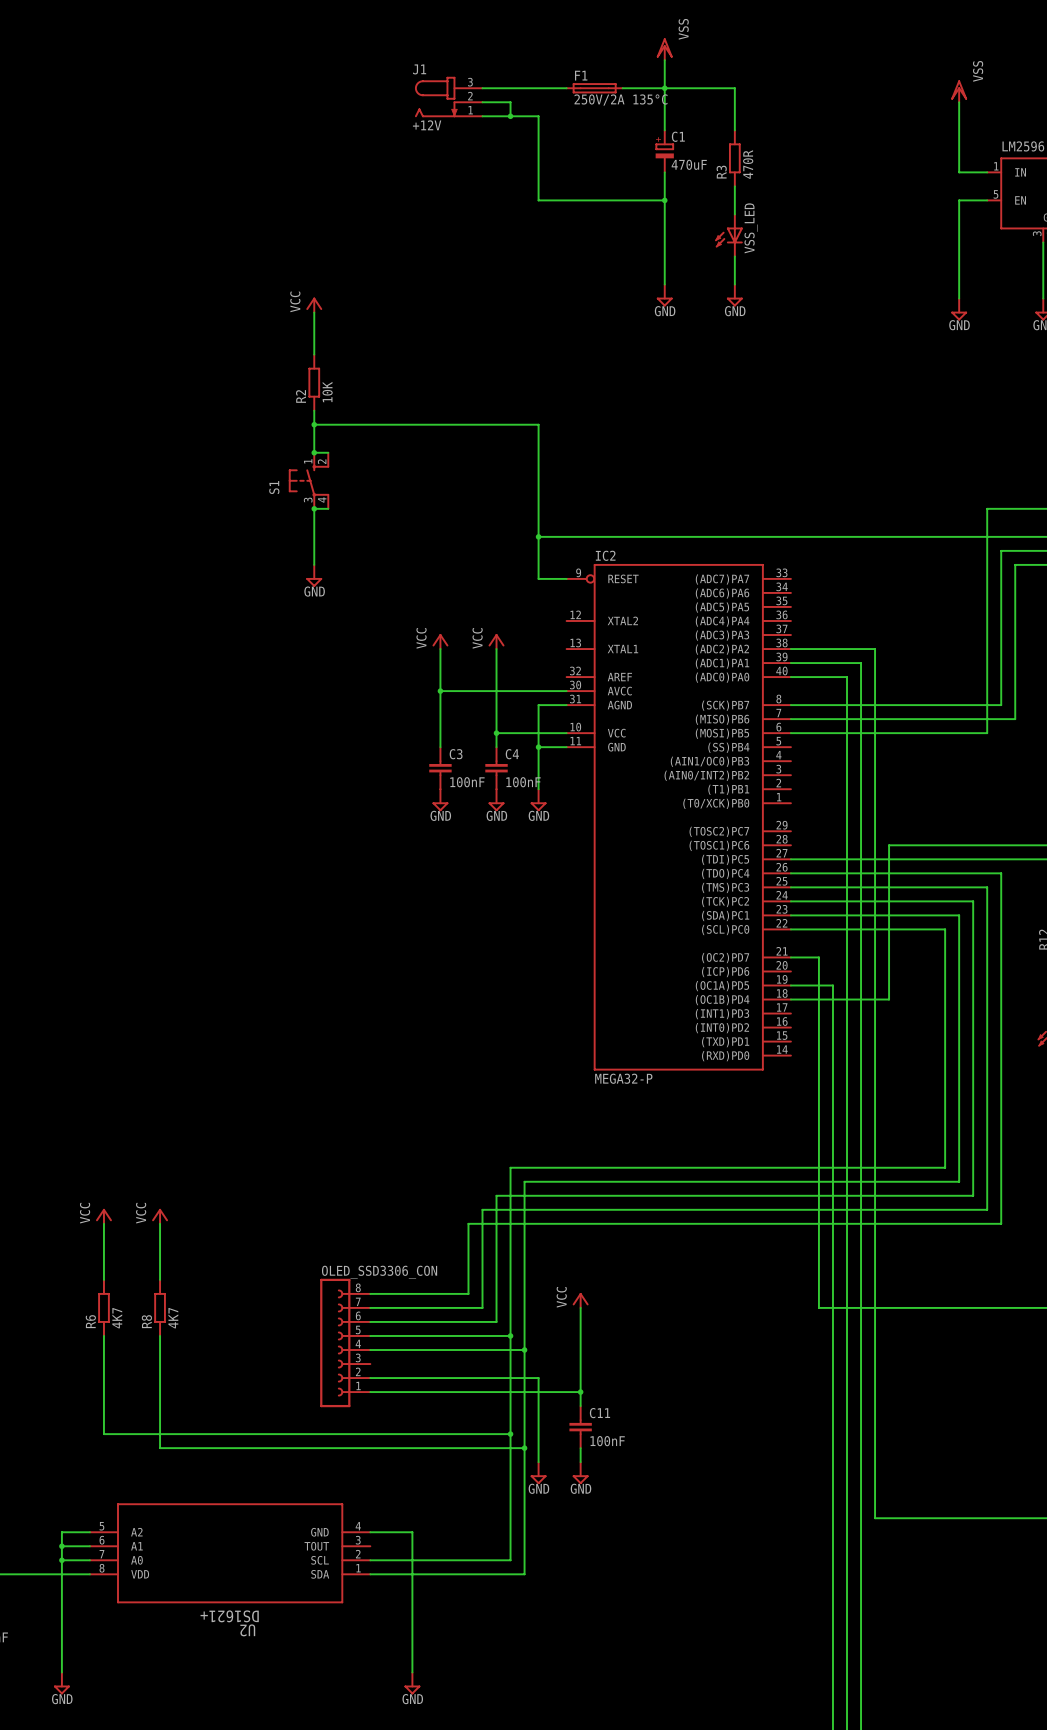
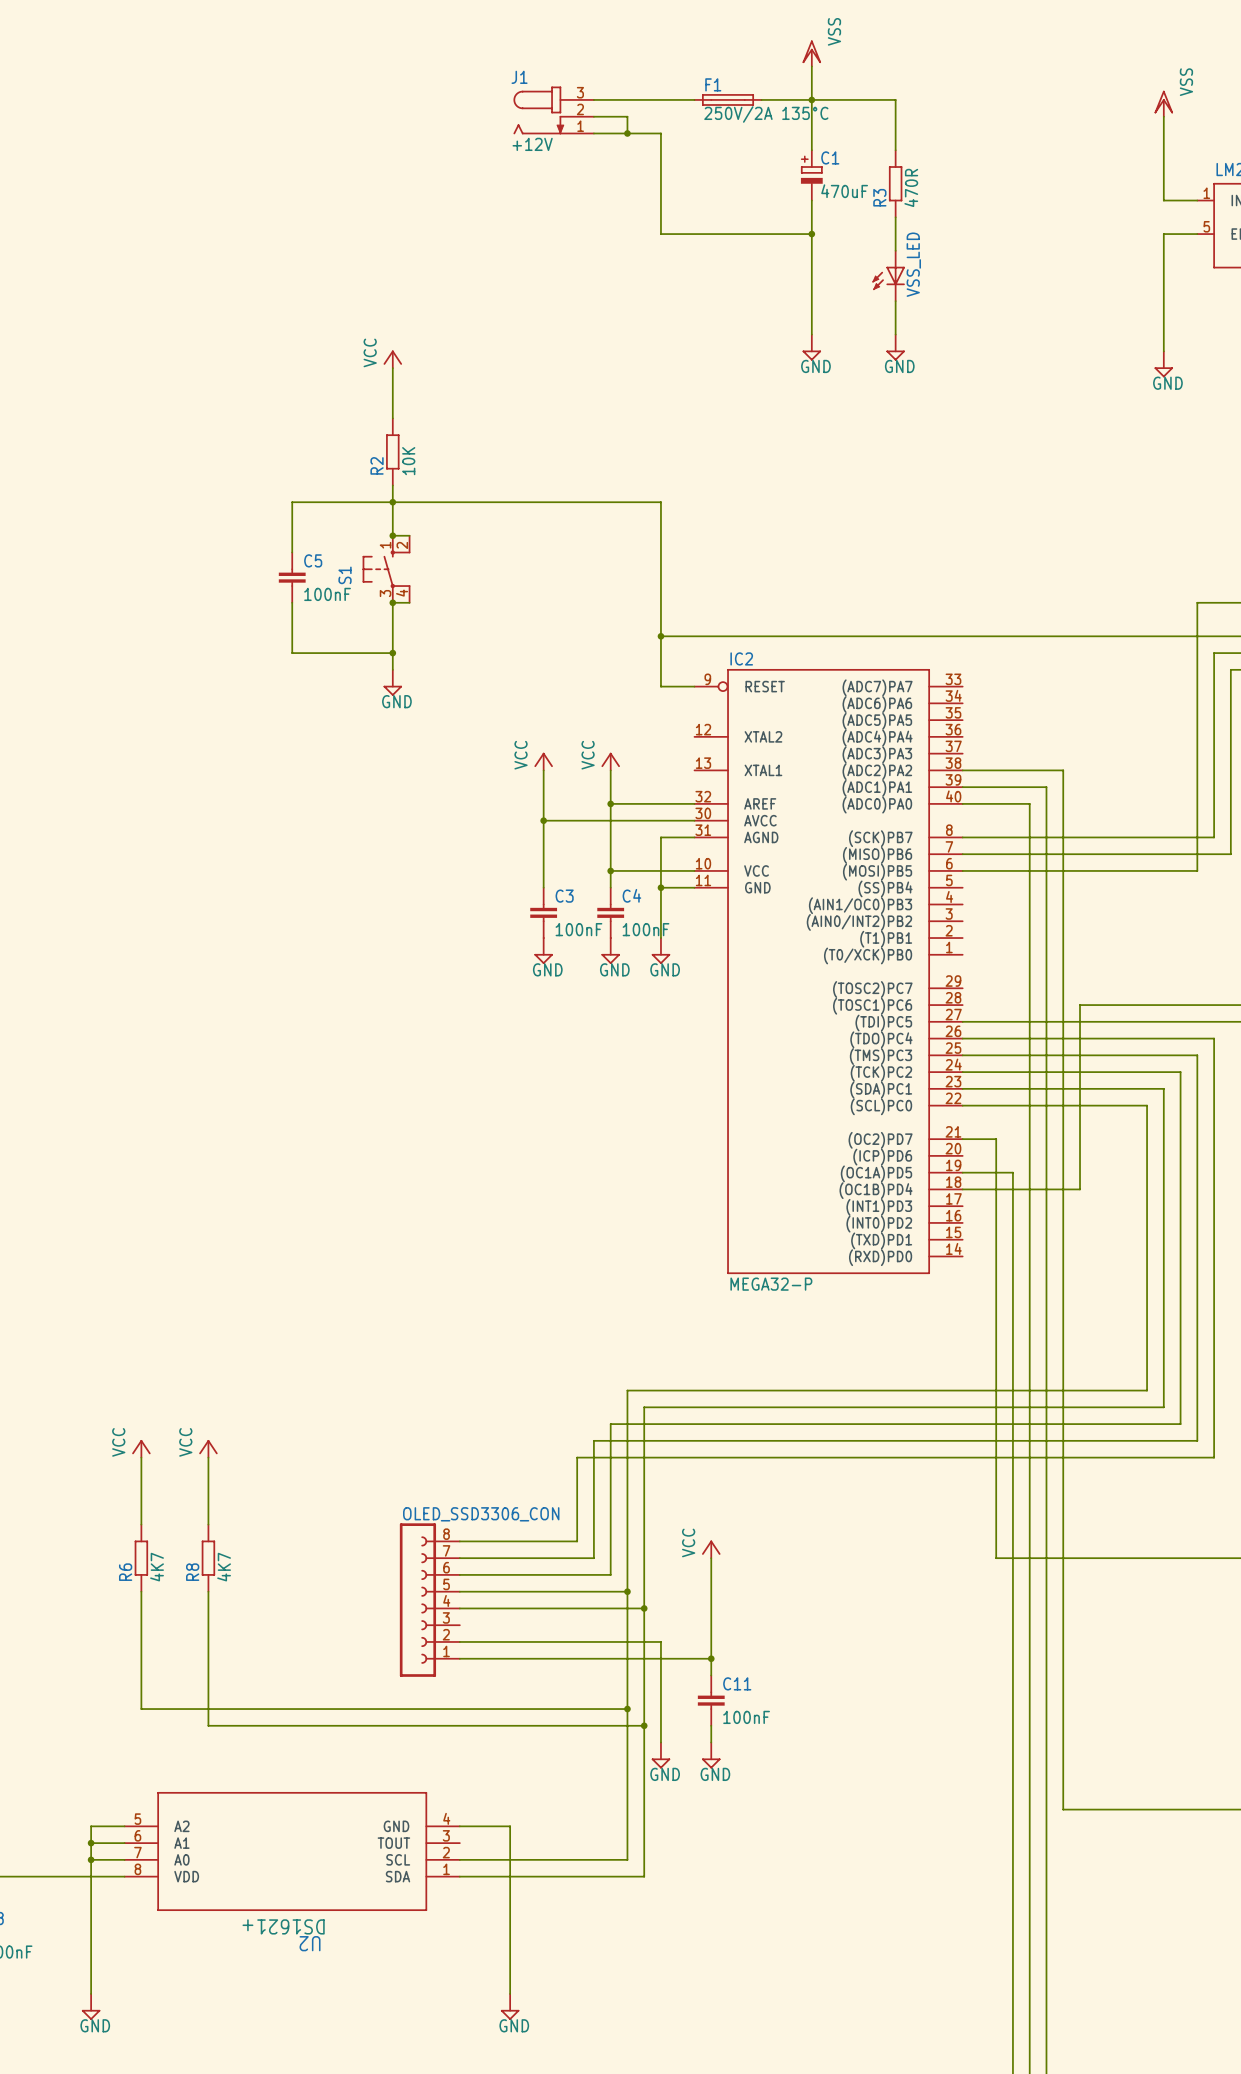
wire: none -> (392, 502) (292, 502) (292, 552)
C5: none -> 100nF (292, 577)
wire: none -> (292, 602) (292, 653) (392, 653)
junction: none -> (392, 653)
wire: none -> (610, 803) (694, 803)
junction: none -> (610, 803)

